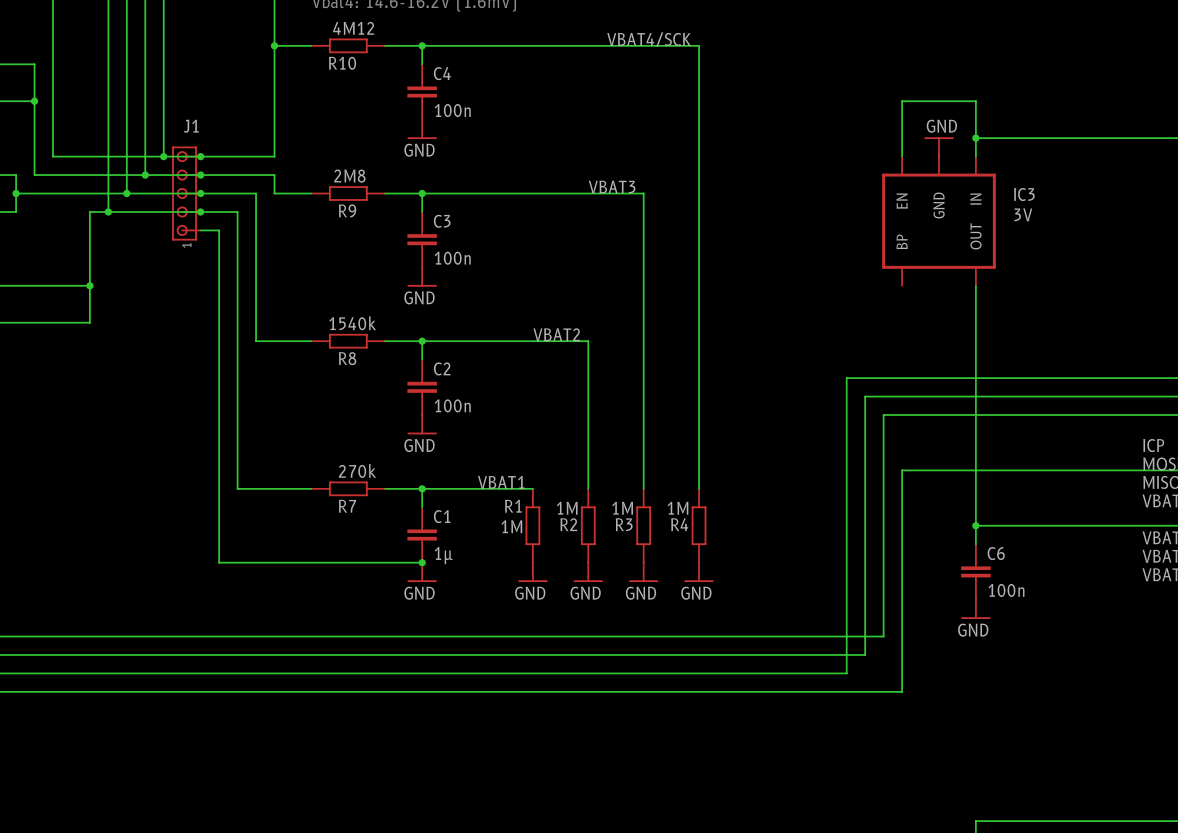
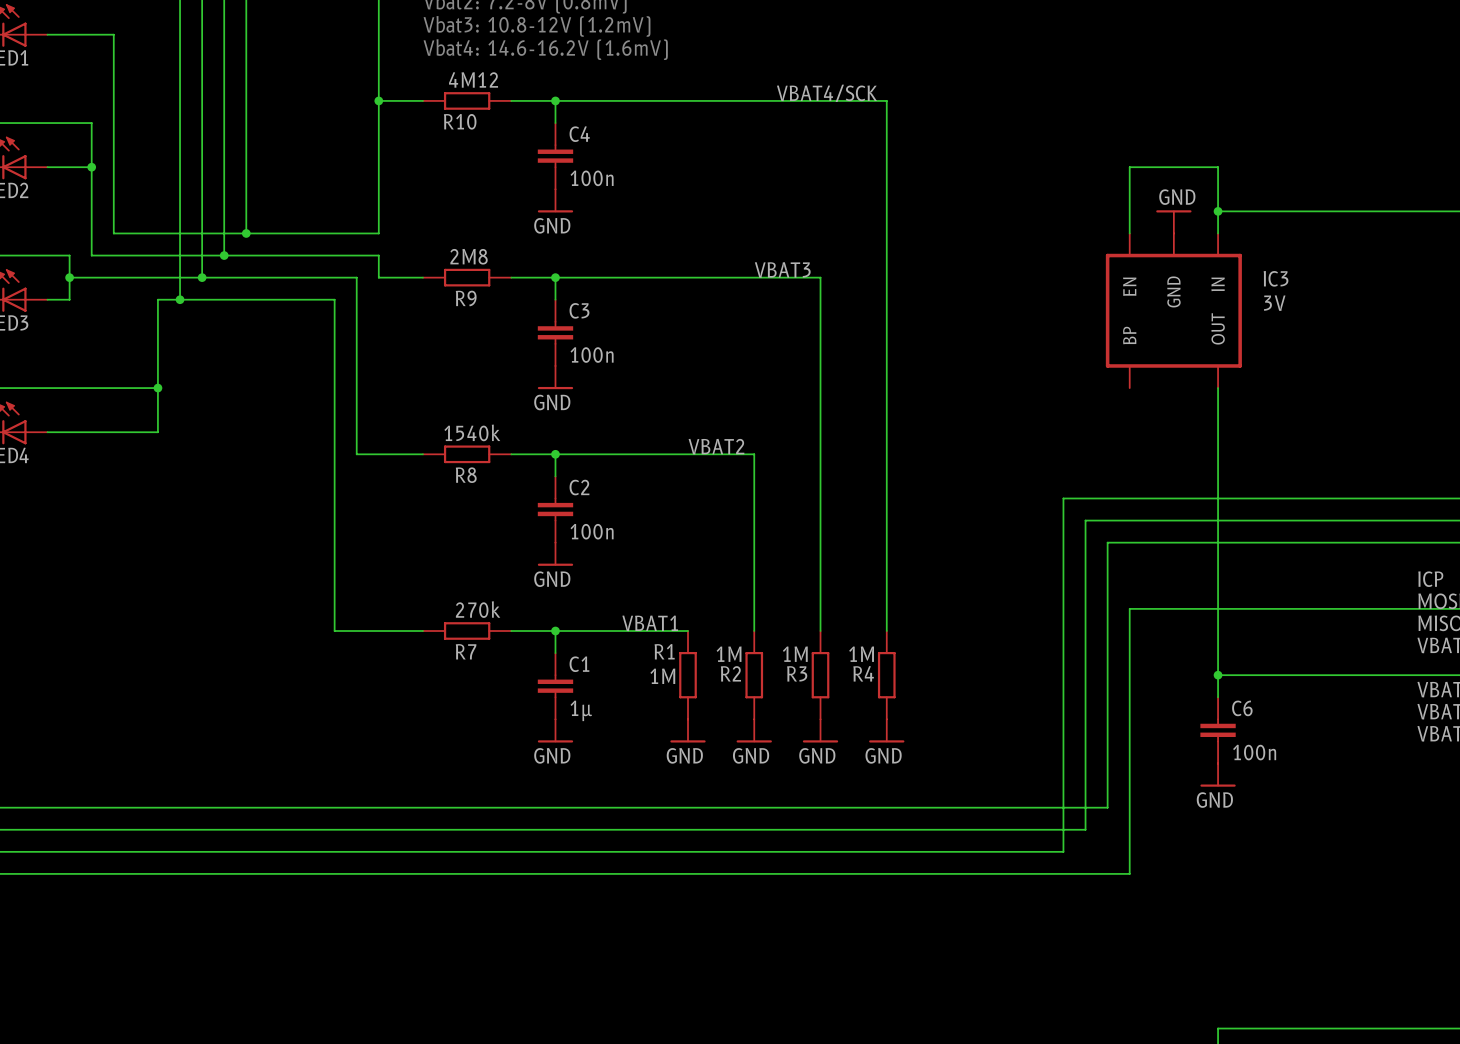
junction: (200, 156) -> none
junction: (200, 175) -> none
J1: (186, 193) -> none
junction: (200, 193) -> none
junction: (200, 211) -> none
wire: (200, 230) (219, 230) (219, 562) (422, 562) -> none
junction: (422, 562) -> none

